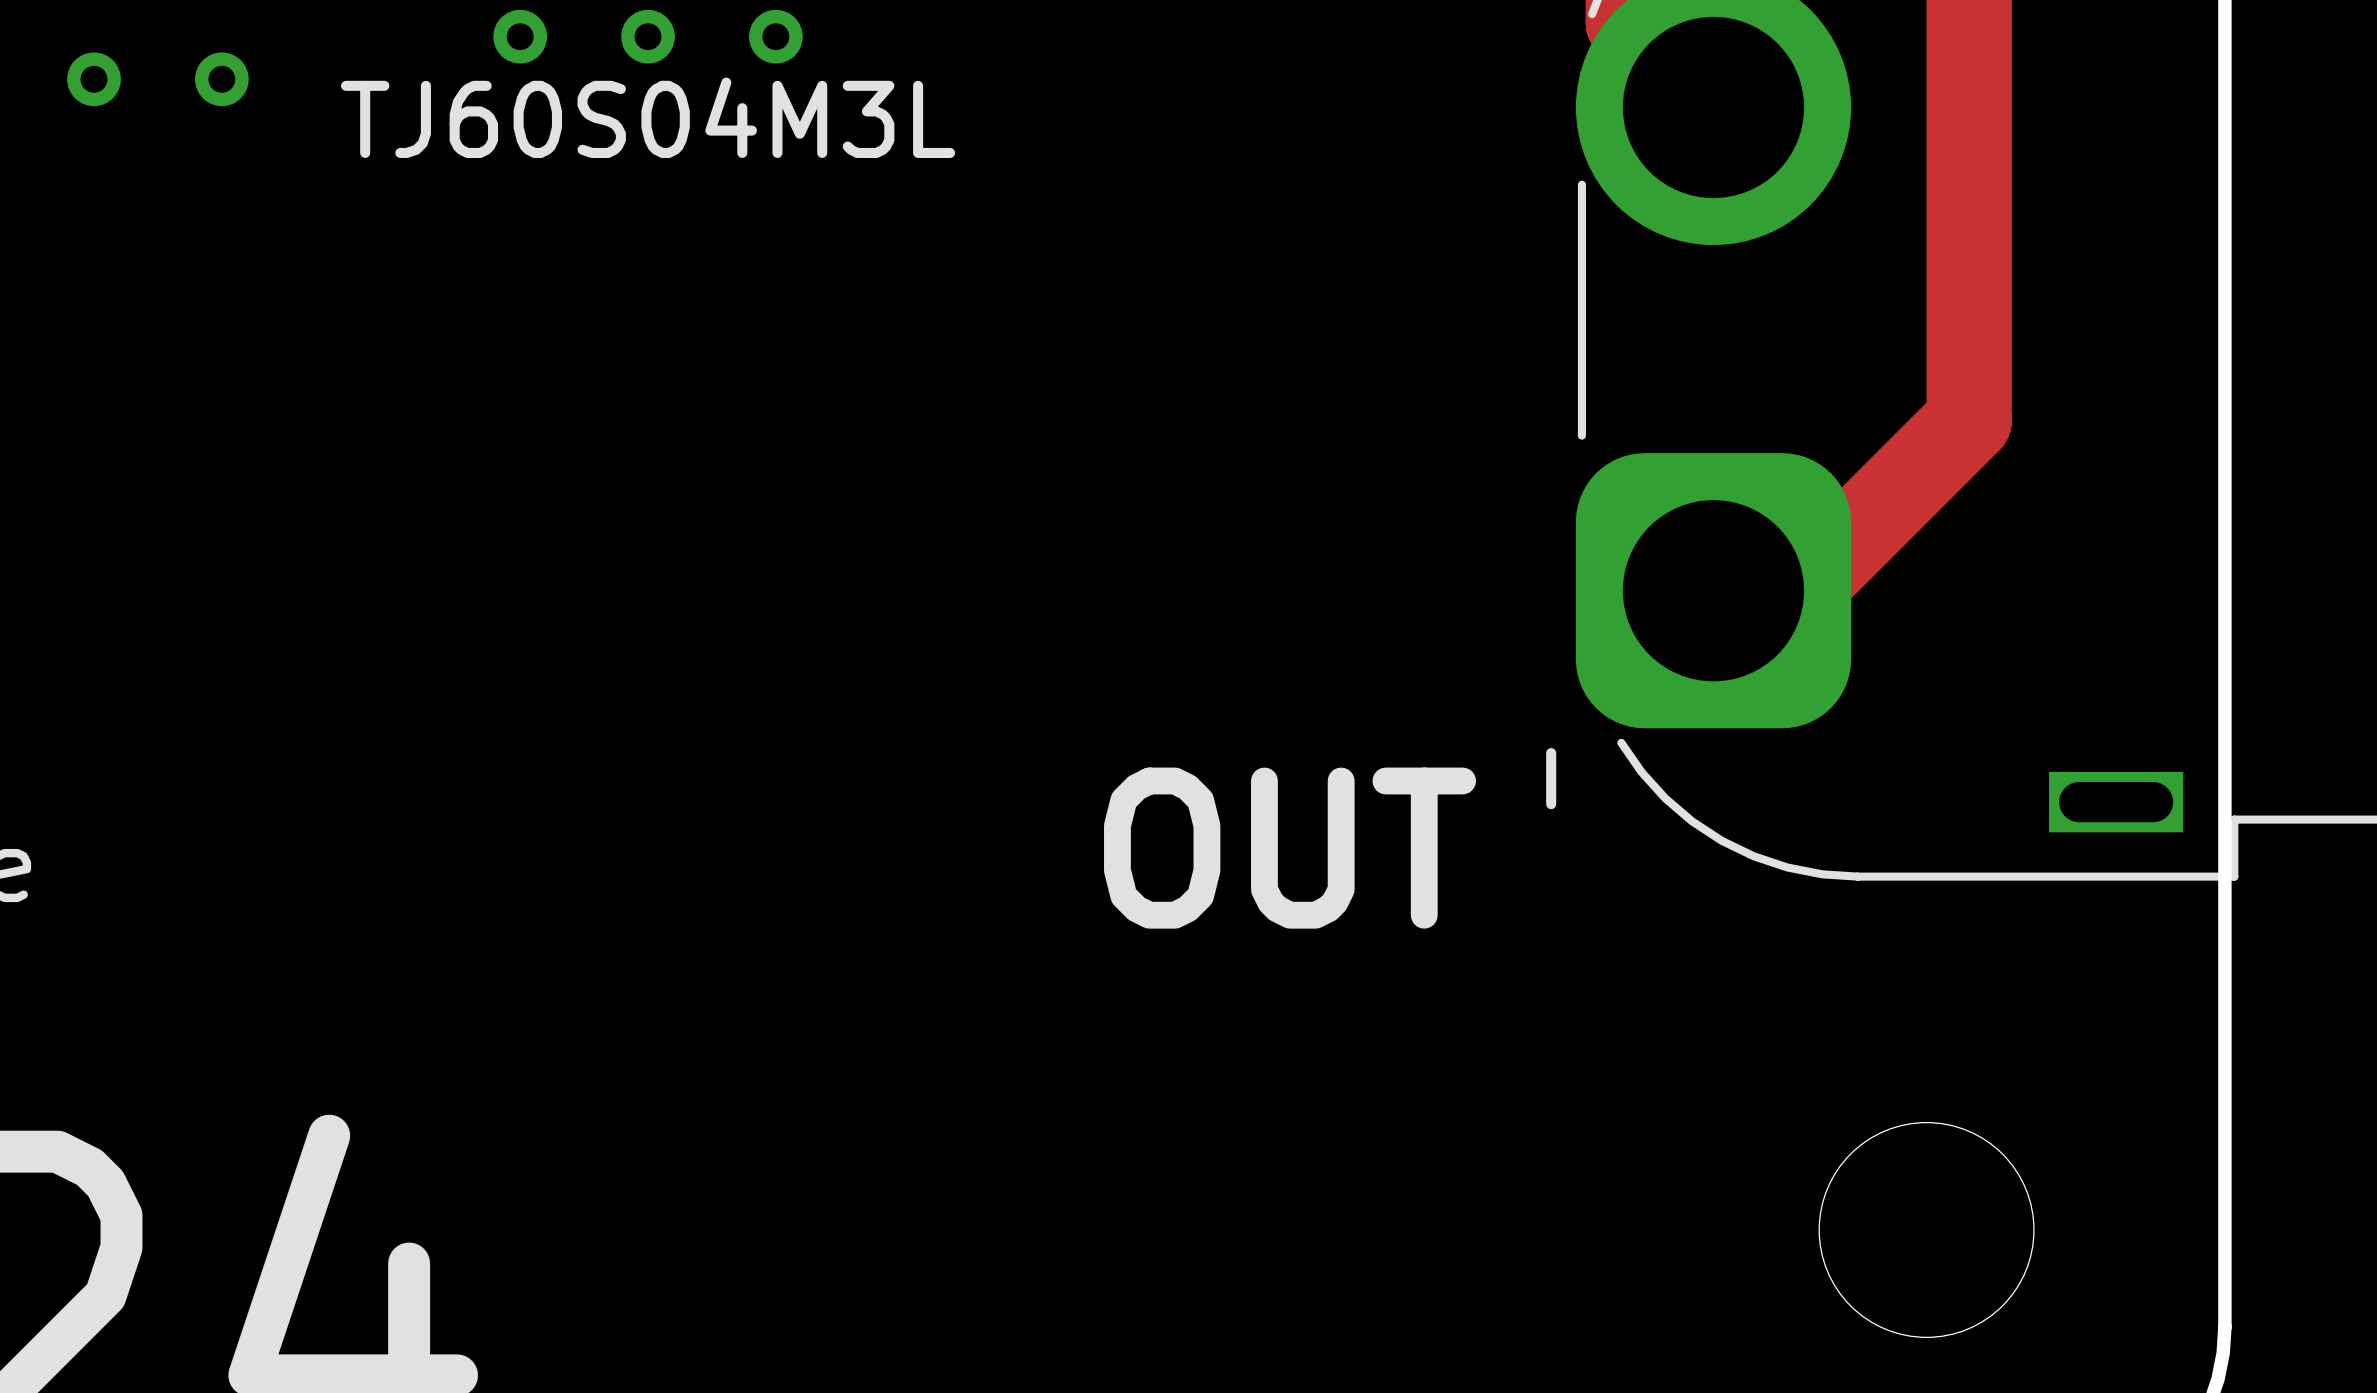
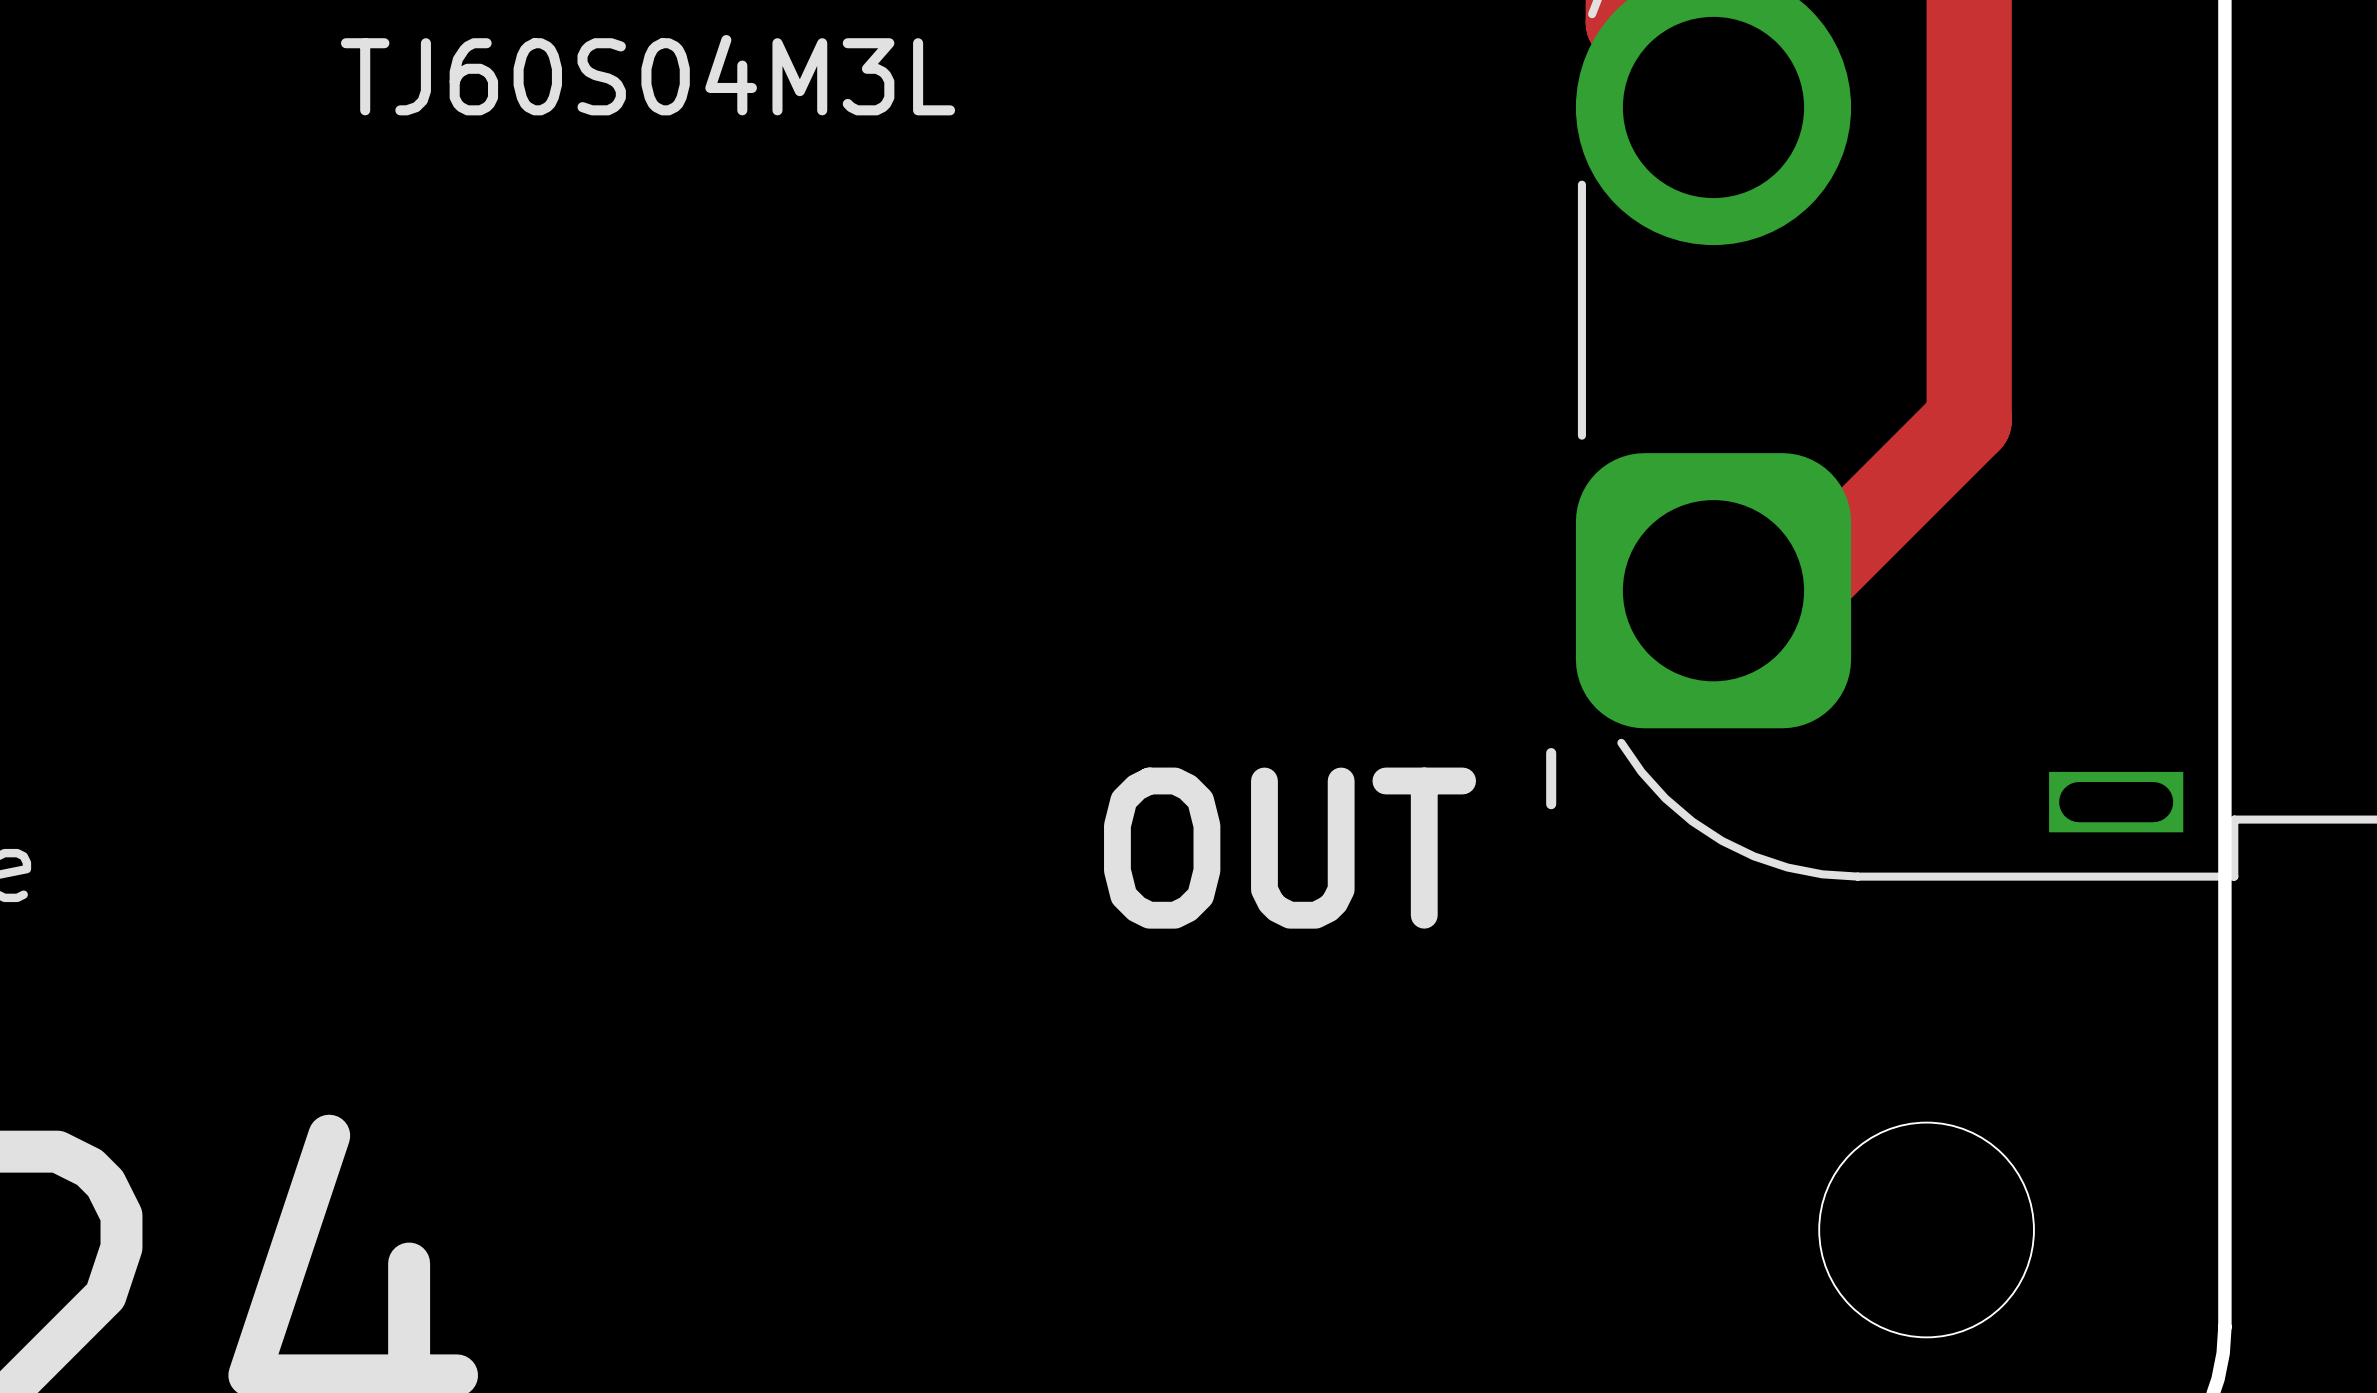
via: (520, 36) -> none
via: (648, 36) -> none
via: (775, 36) -> none
via: (94, 79) -> none
via: (221, 79) -> none
part value position: TJ60S04M3L (648, 117) -> TJ60S04M3L (648, 75)

